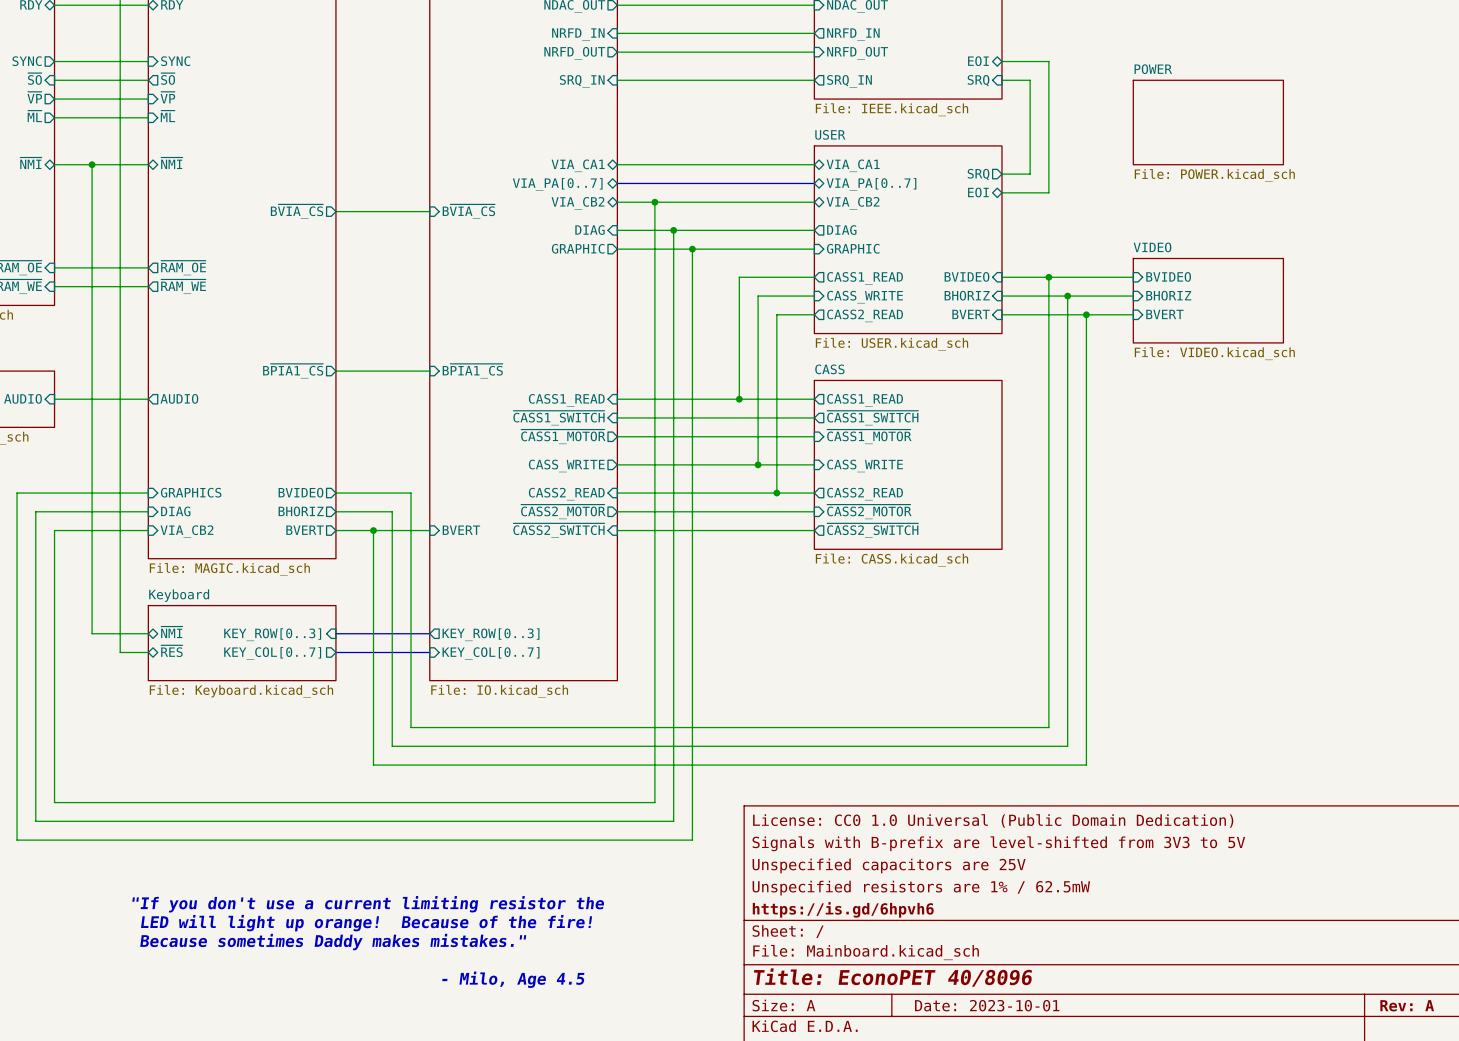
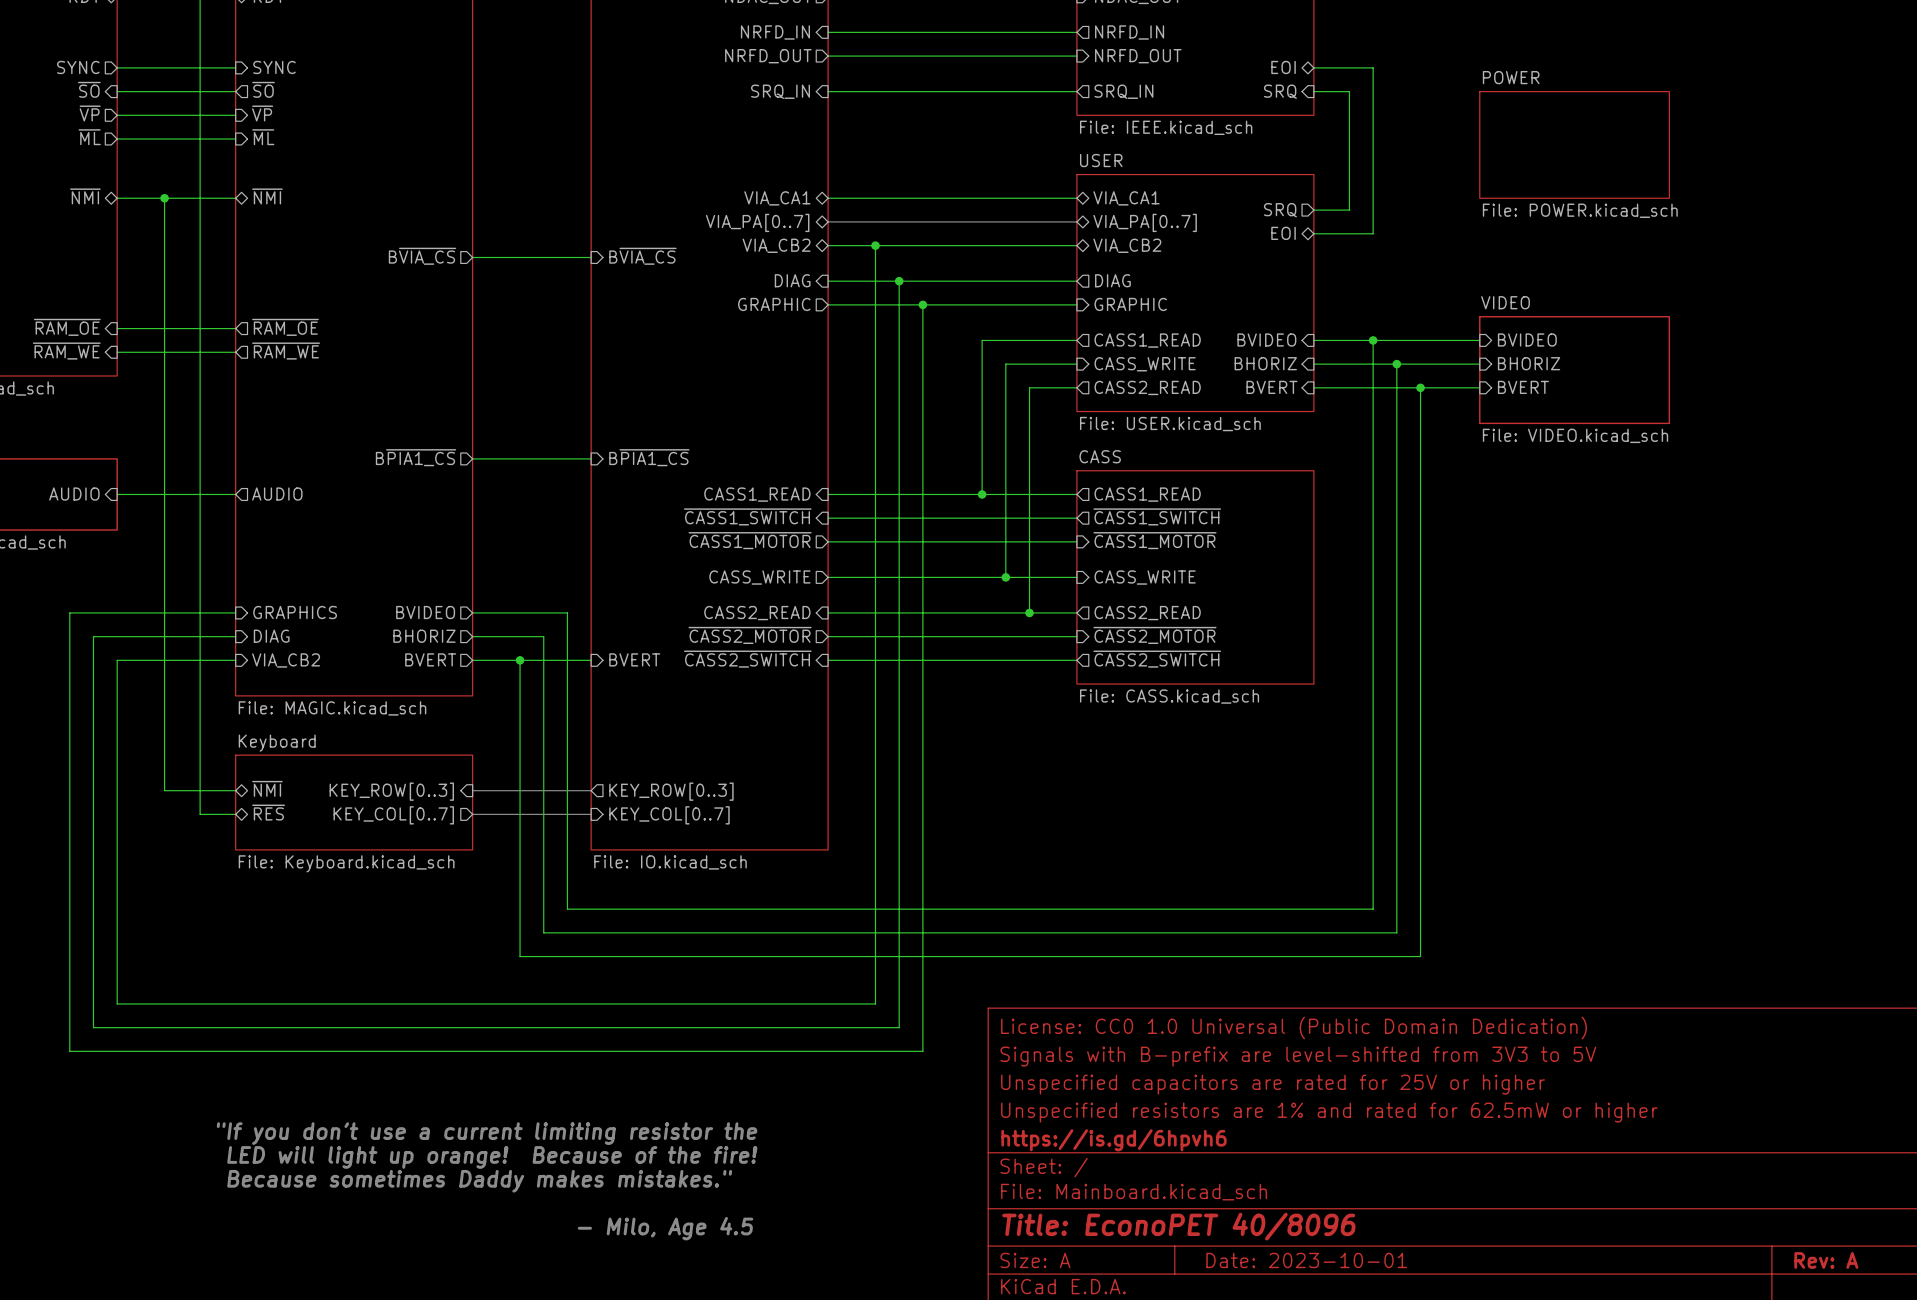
title block: Unspecified capacitors are 25V (889, 865) -> Unspecified capacitors are rated for 25V or higher (1273, 1084)
title block: Unspecified resistors are 1% / 62.5mW (921, 888) -> Unspecified resistors are 1% and rated for 62.5mW or higher (1329, 1112)

